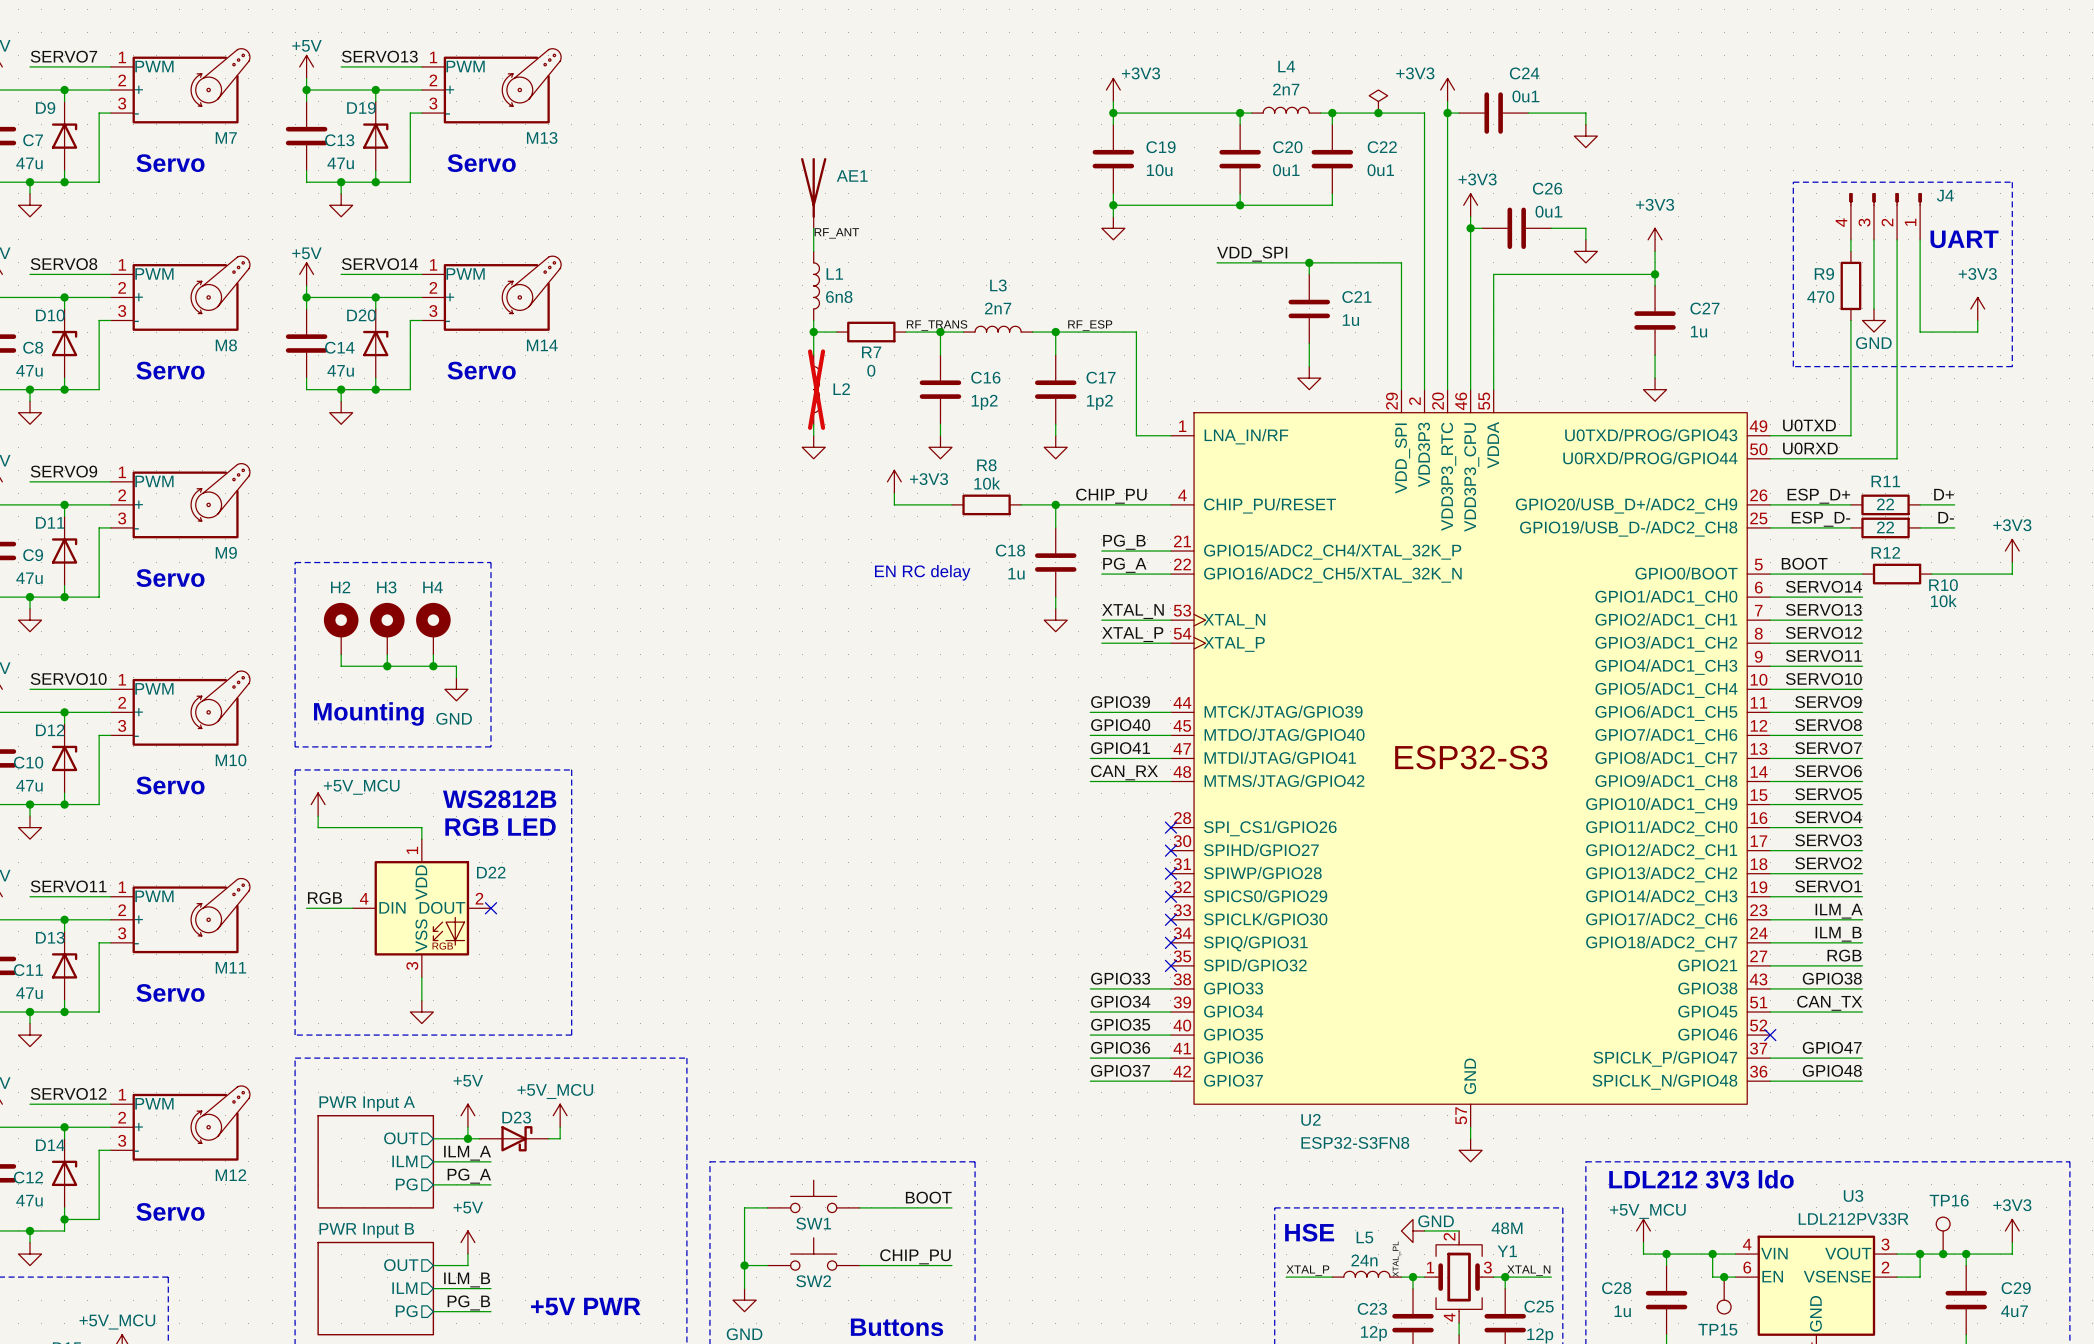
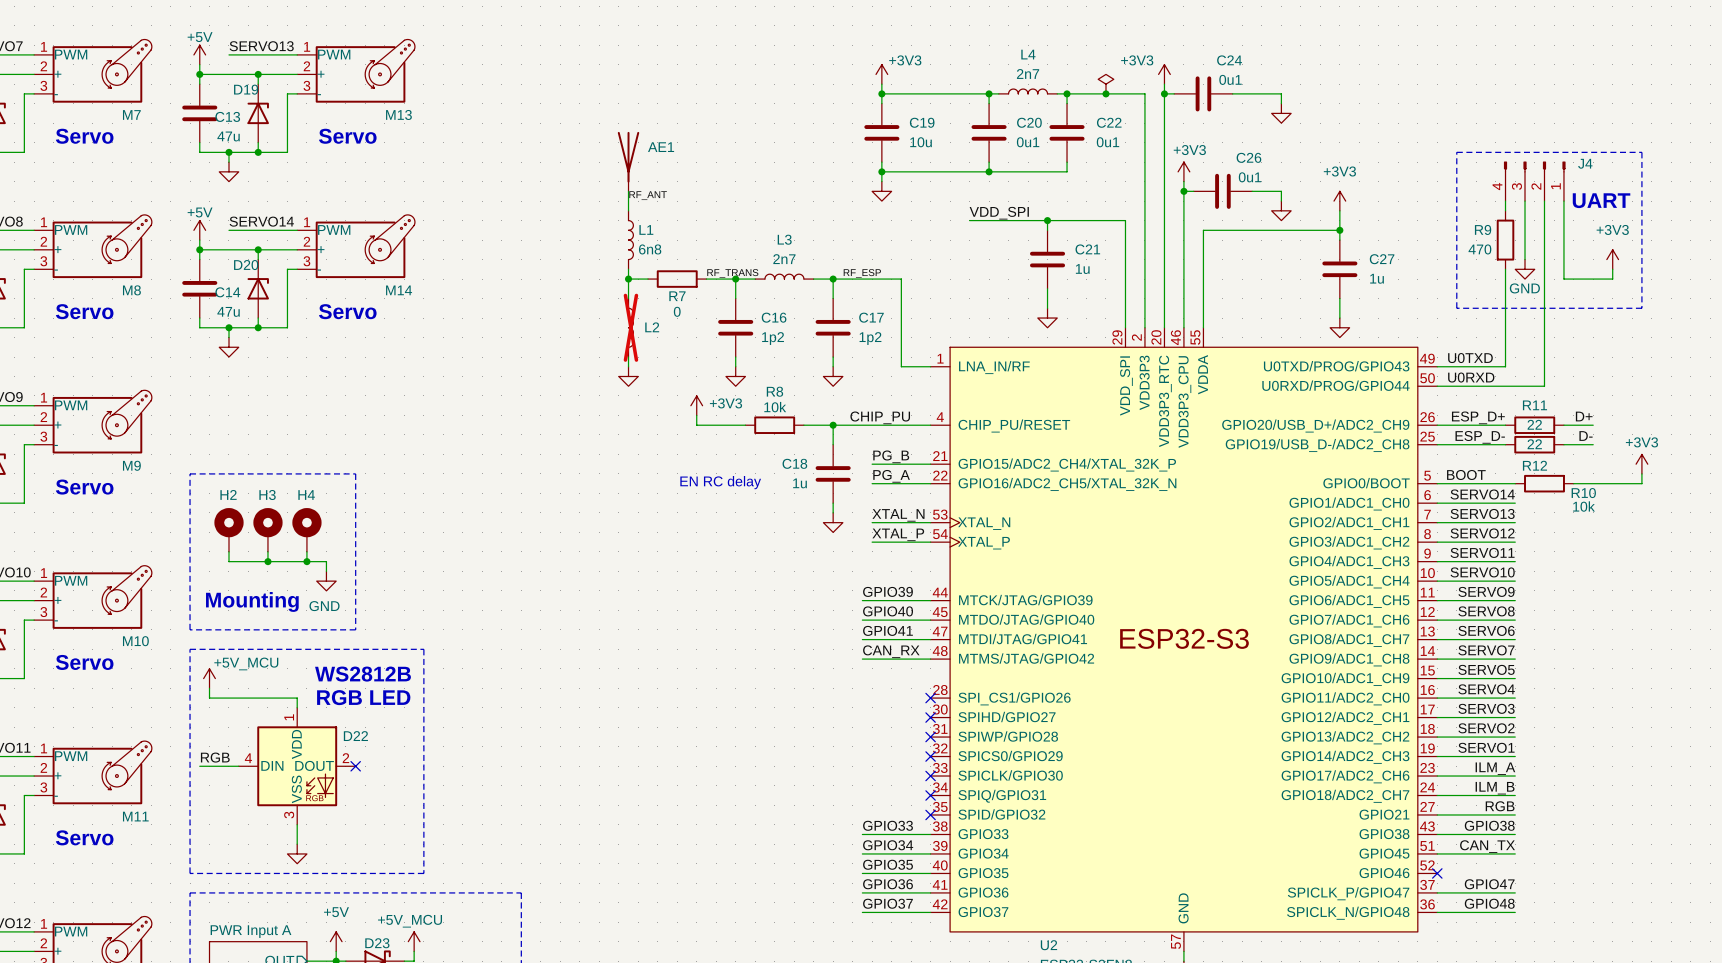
label: SERVO7 (1828, 748) -> SERVO6 (1486, 630)
label: SERVO6 (1828, 771) -> SERVO7 (1486, 650)

